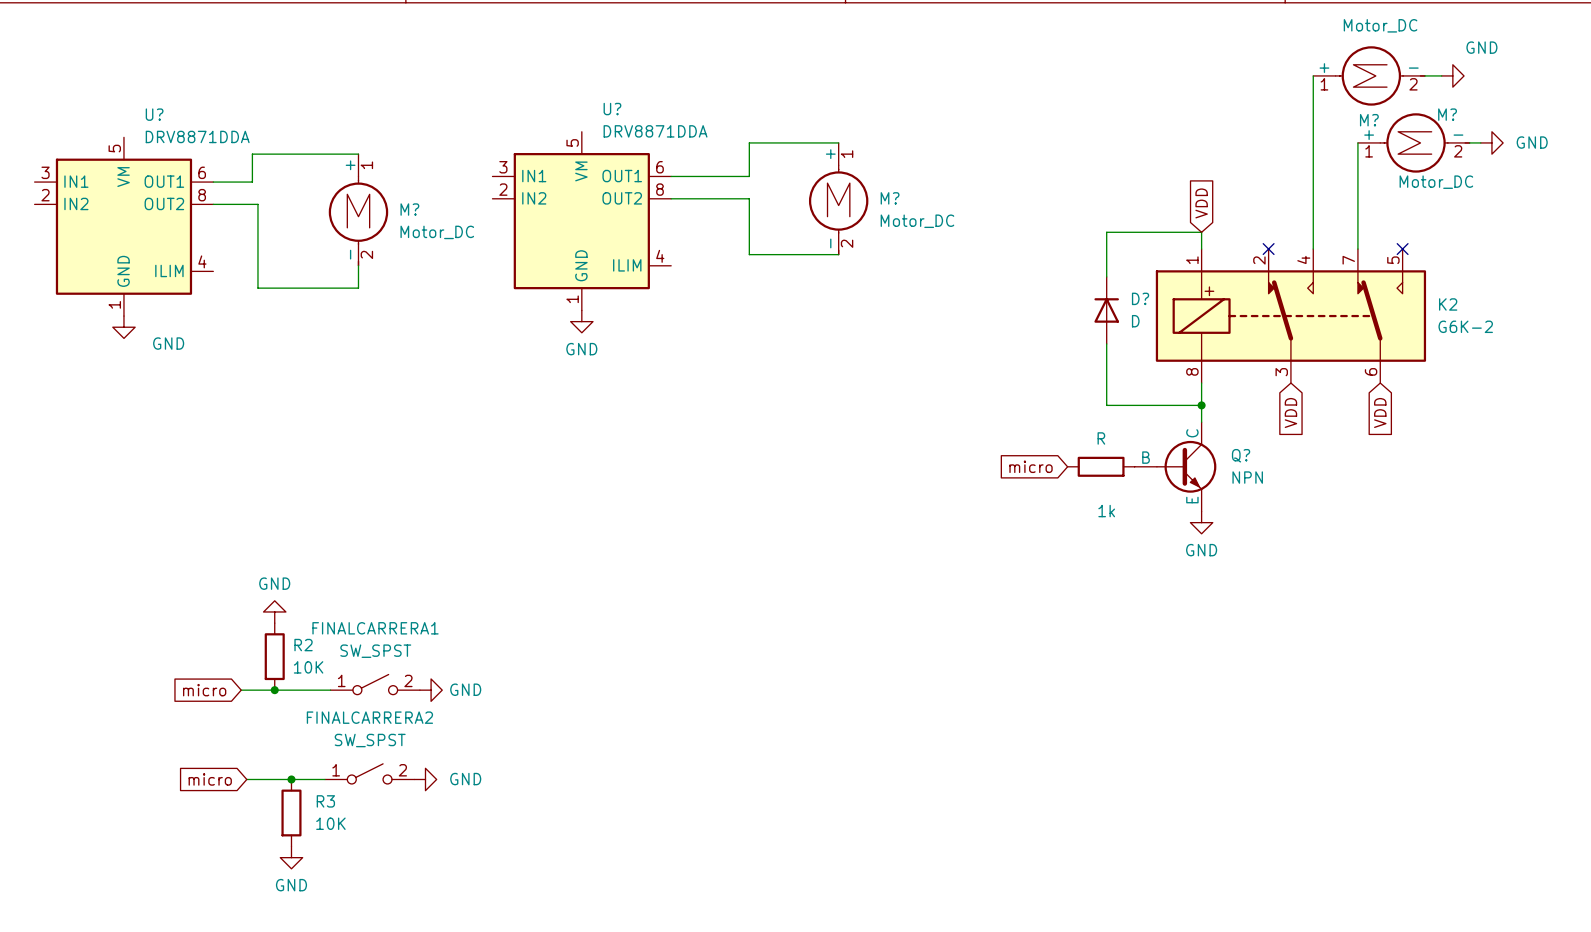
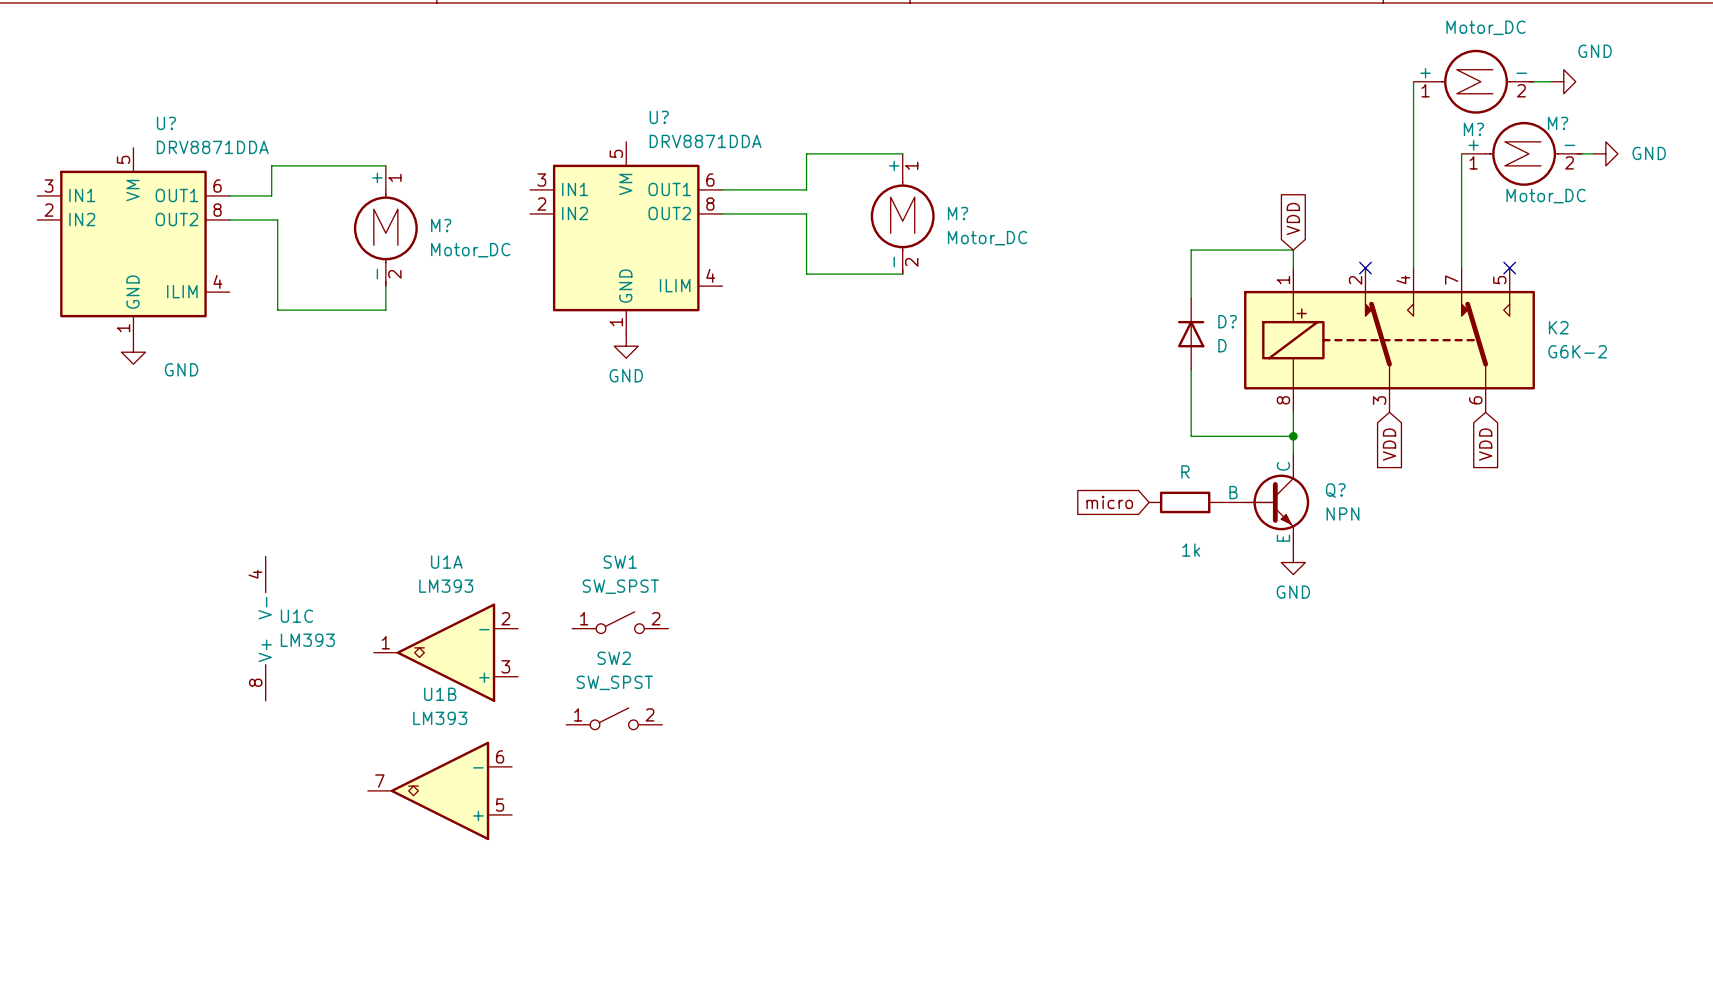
SW1: none -> SW_SPST (620, 622)
U1C: none -> LM393 (265, 628)
U1A: none -> LM393 (445, 652)
power symbol: GND (274, 611) -> none
R2: 10K (274, 656) -> none
SW2: none -> SW_SPST (614, 718)
FINALCARRERA1: SW_SPST (375, 684) -> none
global label: micro (204, 690) -> none
wire: (241, 690) (330, 690) -> none
junction: (274, 690) -> none
power symbol: GND (431, 690) -> none
U1B: none -> LM393 (439, 790)
FINALCARRERA2: SW_SPST (369, 773) -> none
global label: micro (210, 779) -> none
wire: (246, 779) (324, 779) -> none
junction: (291, 779) -> none
power symbol: GND (425, 779) -> none
R3: 10K (291, 812) -> none
power symbol: GND (291, 857) -> none

